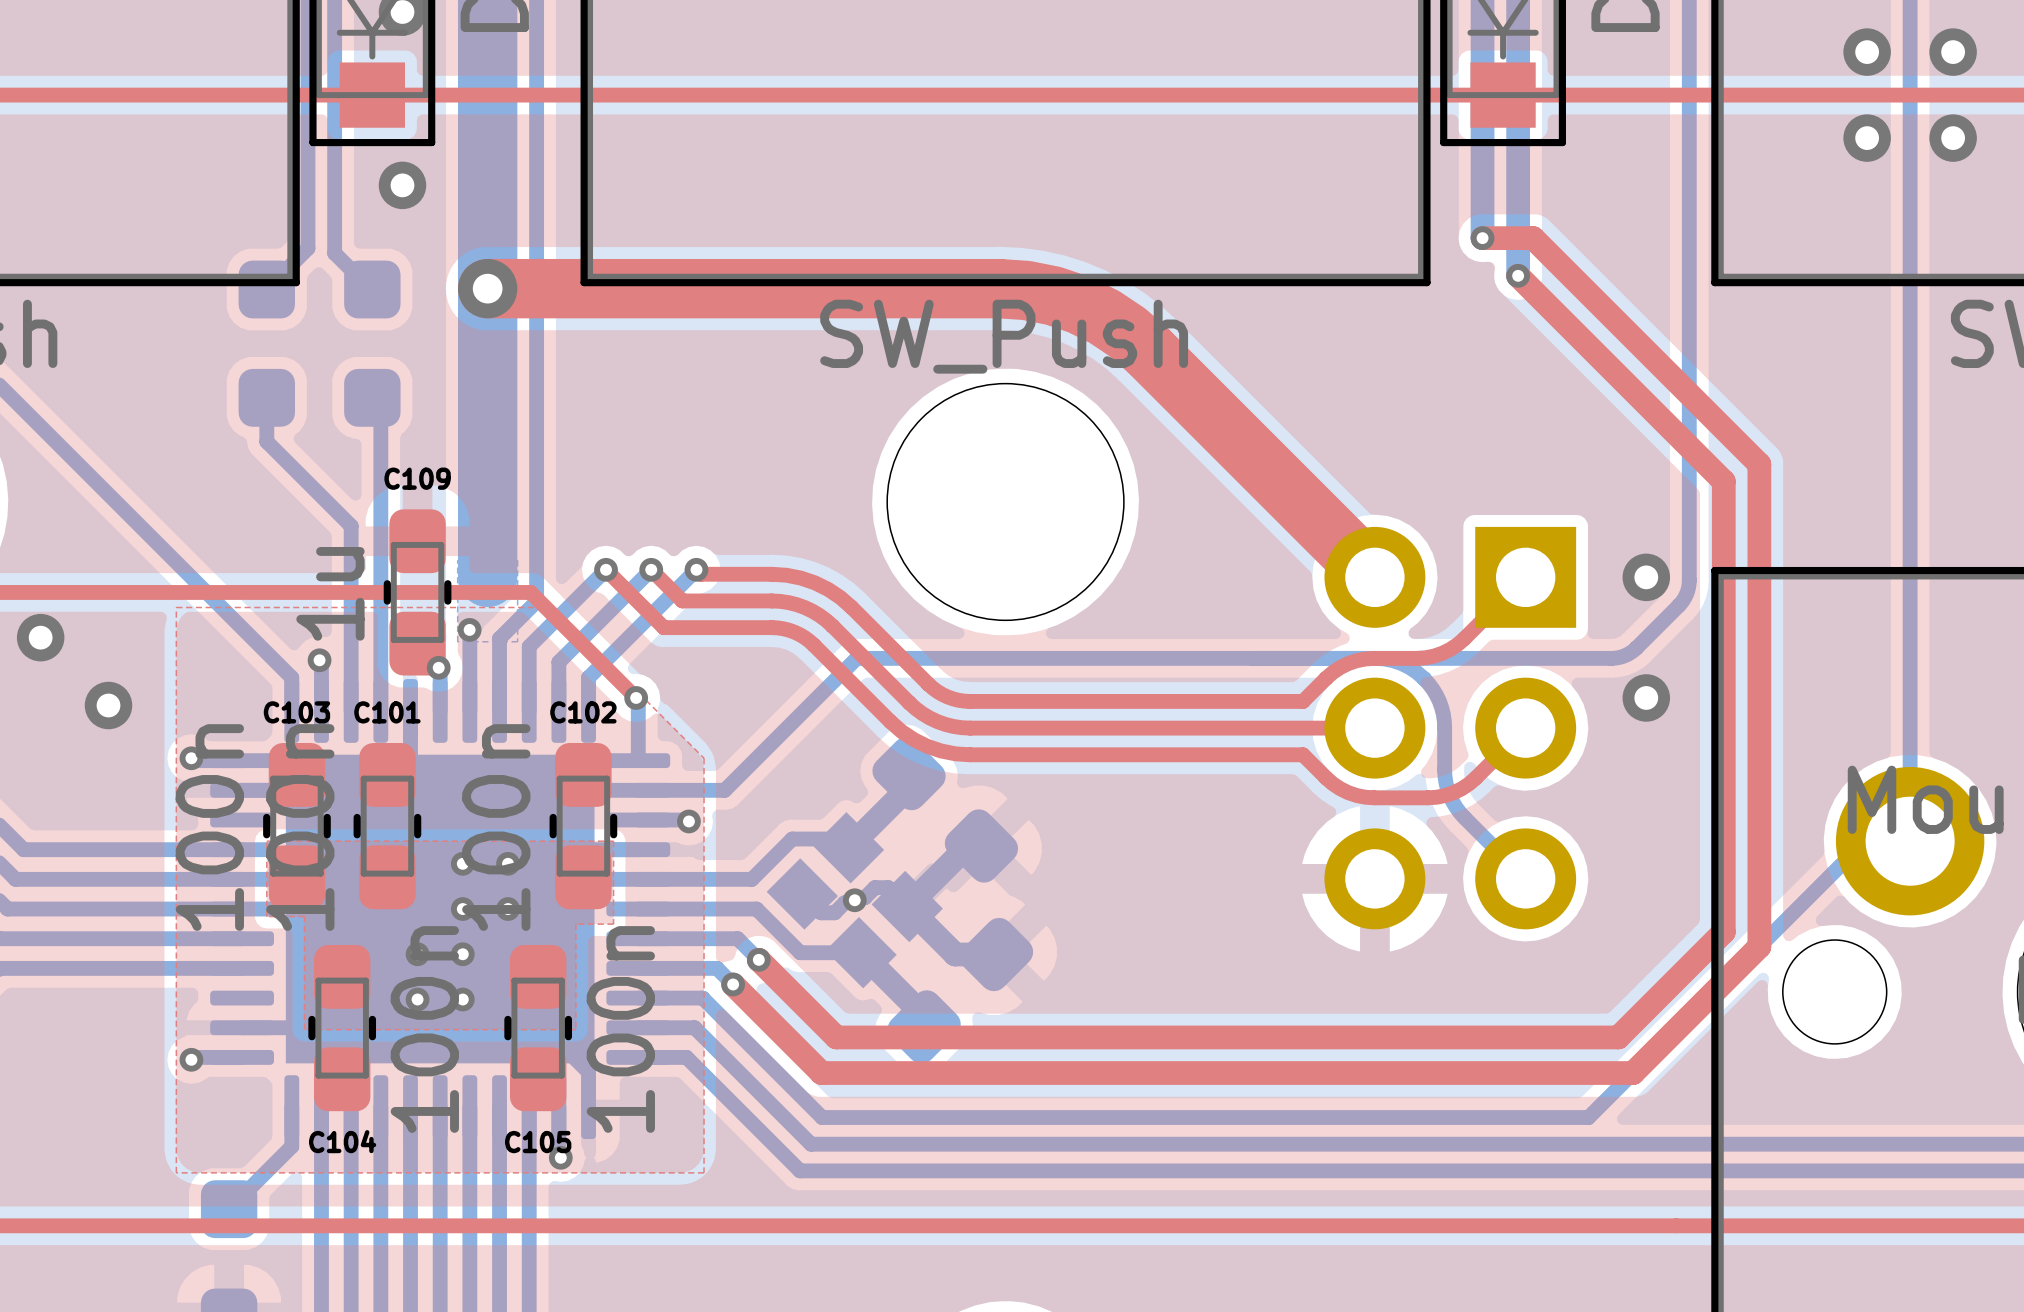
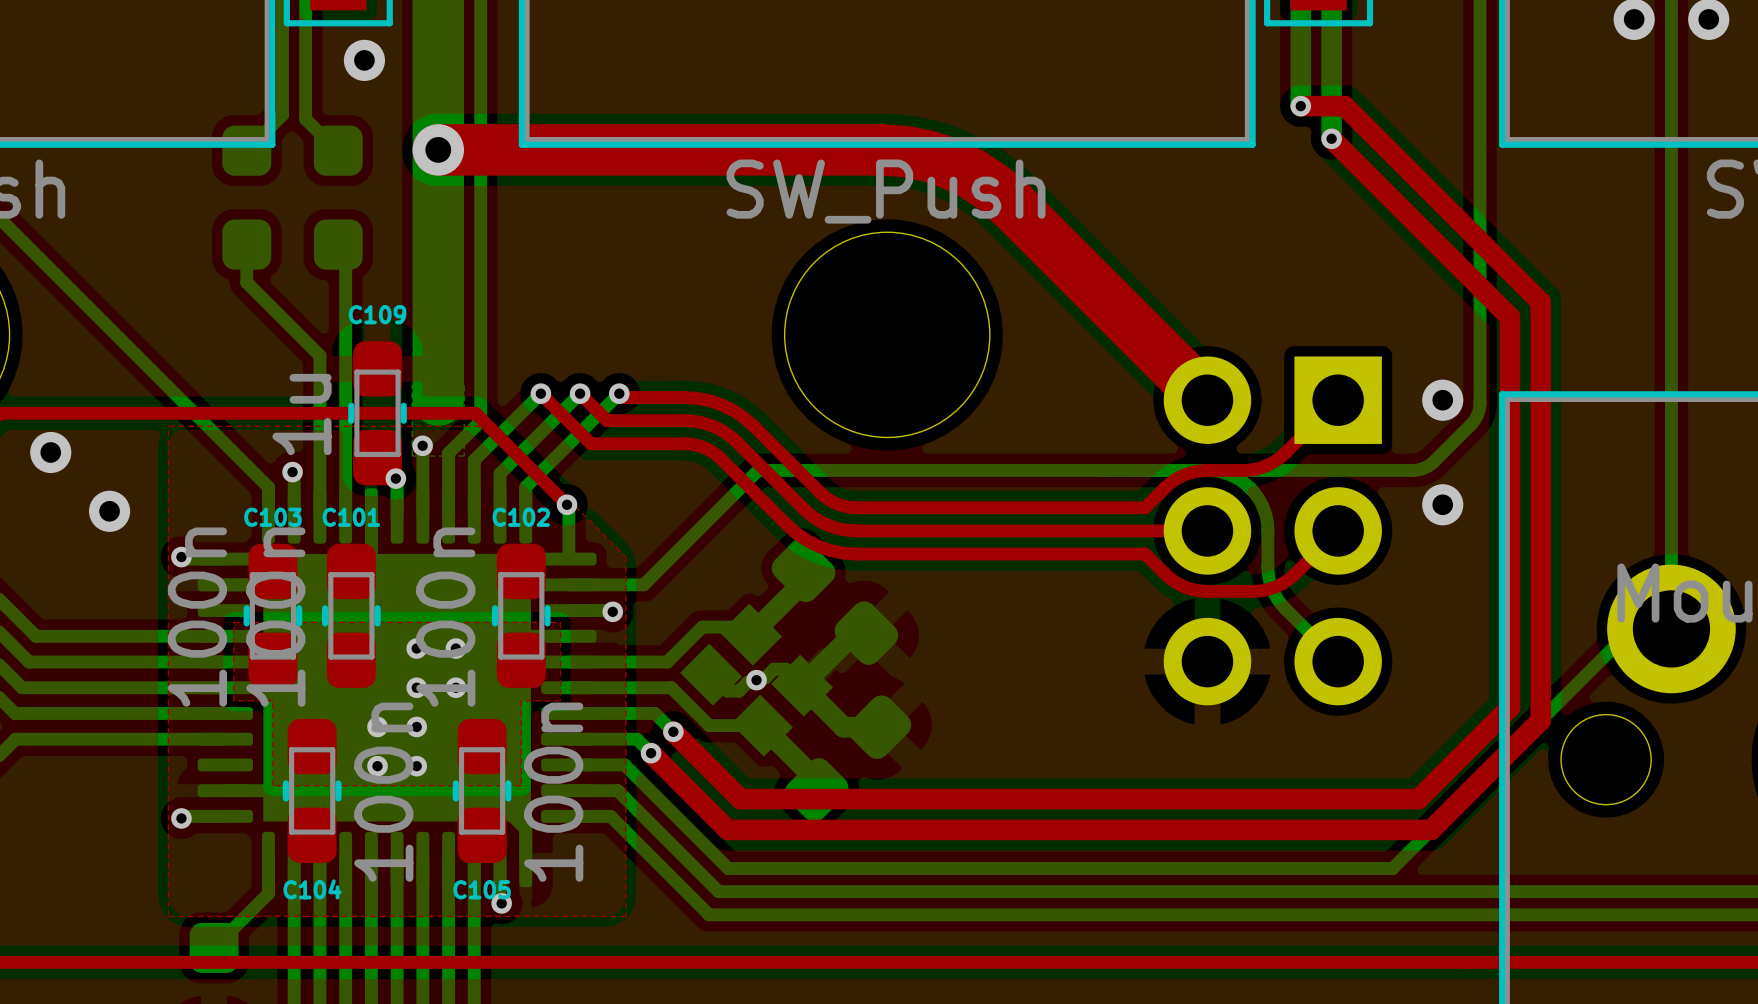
top zone outline: (583, 924) (575, 924) (575, 1029) (304, 1029) (304, 916) (266, 916) (266, 841) (613, 841) (613, 924) -> (521, 700) (521, 785) (272, 785) (272, 700) (233, 700) (233, 622) (560, 622) (560, 700) (547, 700)

